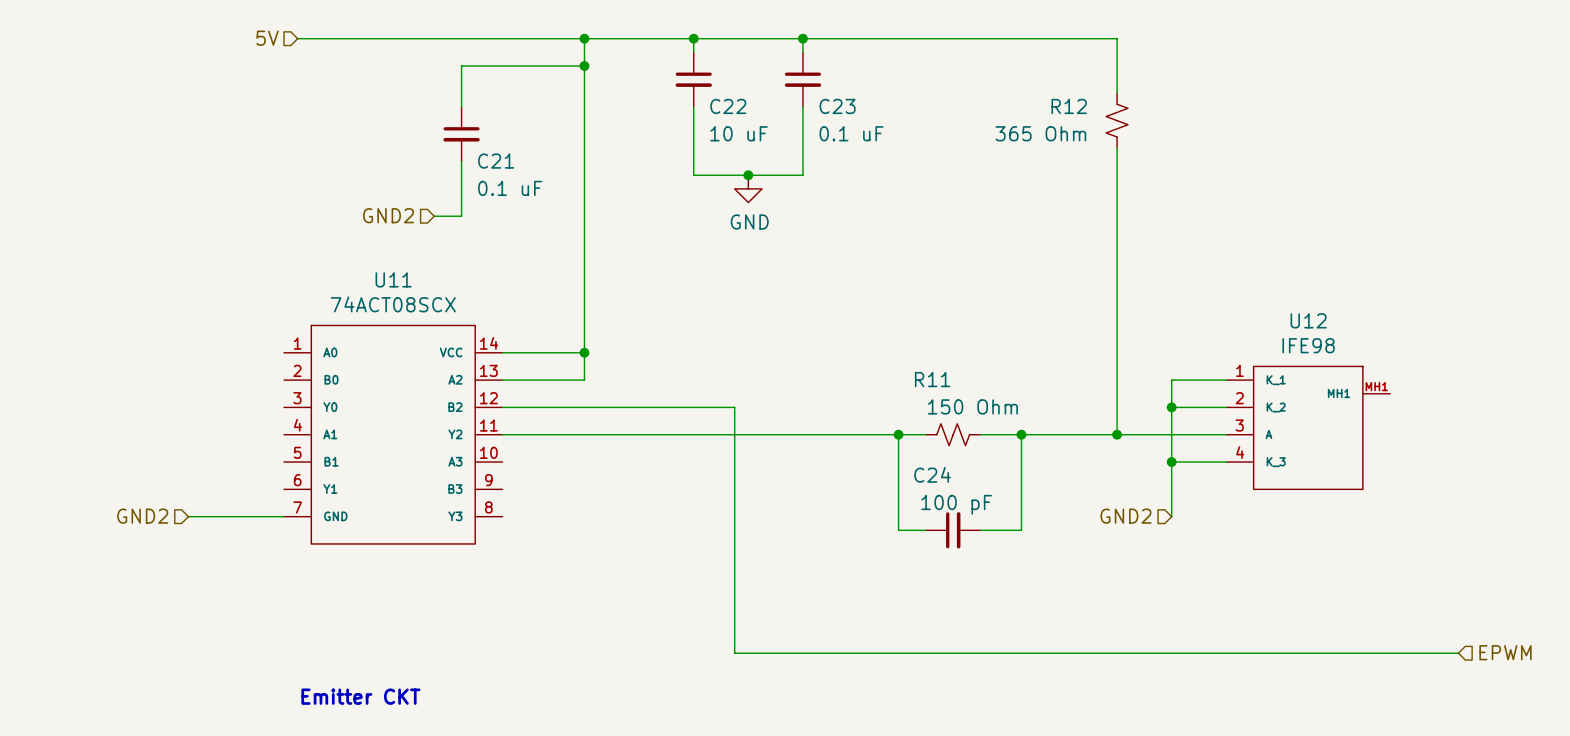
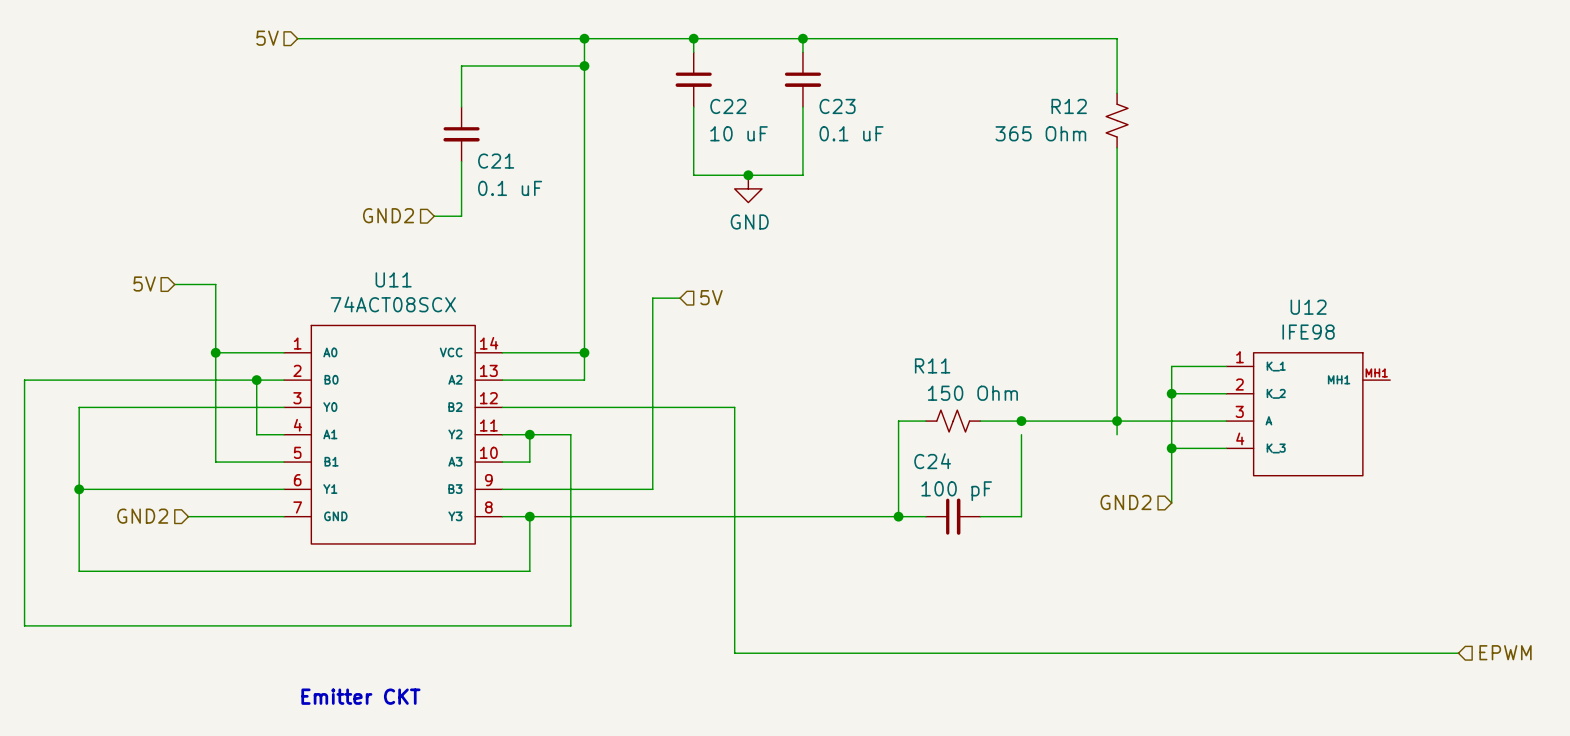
hierarchical label: none -> 5V (144, 283)
wire: none -> (174, 284) (215, 284) (215, 462) (284, 462)
hierarchical label: none -> 5V (711, 297)
wire: none -> (680, 298) (652, 298) (652, 489) (502, 489)
wire: none -> (215, 352) (284, 352)
junction: none -> (215, 352)
wire: none -> (256, 380) (256, 434) (284, 434)
junction: none -> (256, 380)
wire: (1171, 380) (1226, 380) -> (1171, 380) (1171, 366) (1226, 366)
wire: none -> (284, 407) (79, 407) (79, 571) (529, 571) (529, 516)
wire: (1171, 407) (1226, 407) -> (1171, 393) (1226, 393)
junction position: (1171, 407) -> (1171, 393)
wire: none -> (925, 421) (898, 421) (898, 434)
U12 position: (1308, 427) -> (1308, 414)
wire: none -> (529, 434) (529, 462) (502, 462)
junction: none -> (529, 434)
wire: (570, 434) (925, 434) -> (570, 434) (570, 625) (24, 625) (24, 380) (284, 380)
junction: (898, 434) -> none
R11 position: (953, 434) -> (953, 421)
wire: (980, 434) (1226, 434) -> (980, 421) (1226, 421)
junction position: (1021, 434) -> (1021, 421)
junction position: (1117, 434) -> (1117, 421)
wire: (1171, 462) (1226, 462) -> (1171, 448) (1226, 448)
junction position: (1171, 462) -> (1171, 448)
wire: none -> (79, 489) (284, 489)
junction: none -> (79, 489)
wire: (1171, 503) (1171, 516) -> none
wire: none -> (502, 516) (925, 516)
junction: none -> (529, 516)
wire: (898, 516) (898, 530) (925, 530) -> none
junction: none -> (898, 516)
wire: (1021, 516) (1021, 530) (980, 530) -> (1021, 516) (980, 516)
hierarchical label position: GND2 (1125, 516) -> GND2 (1125, 502)
C24 position: (953, 530) -> (953, 516)

